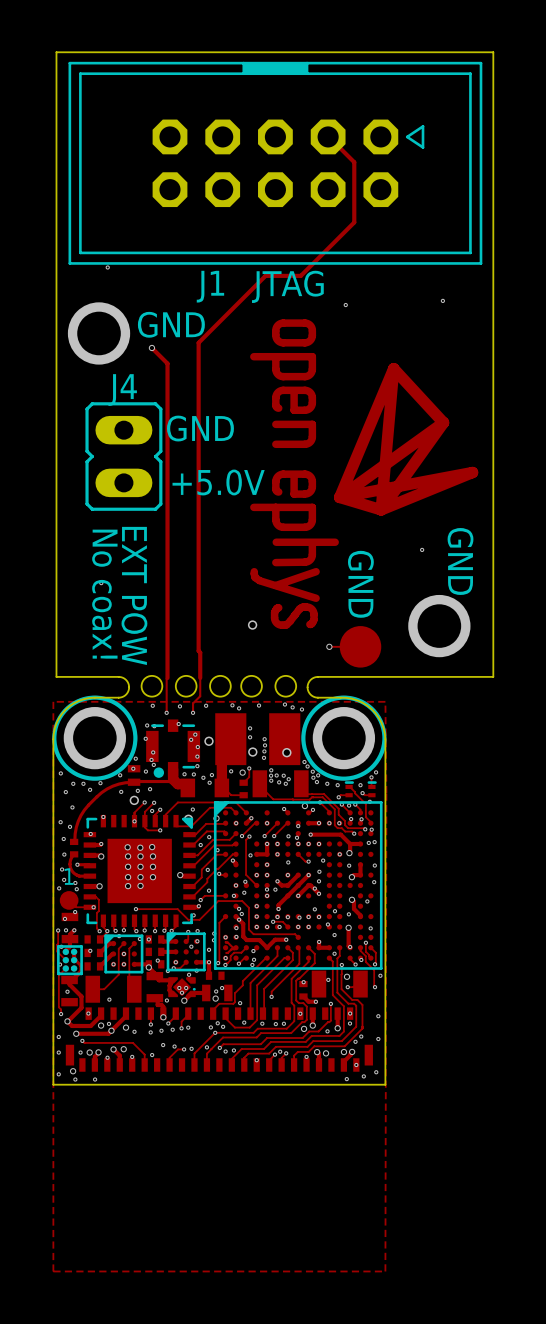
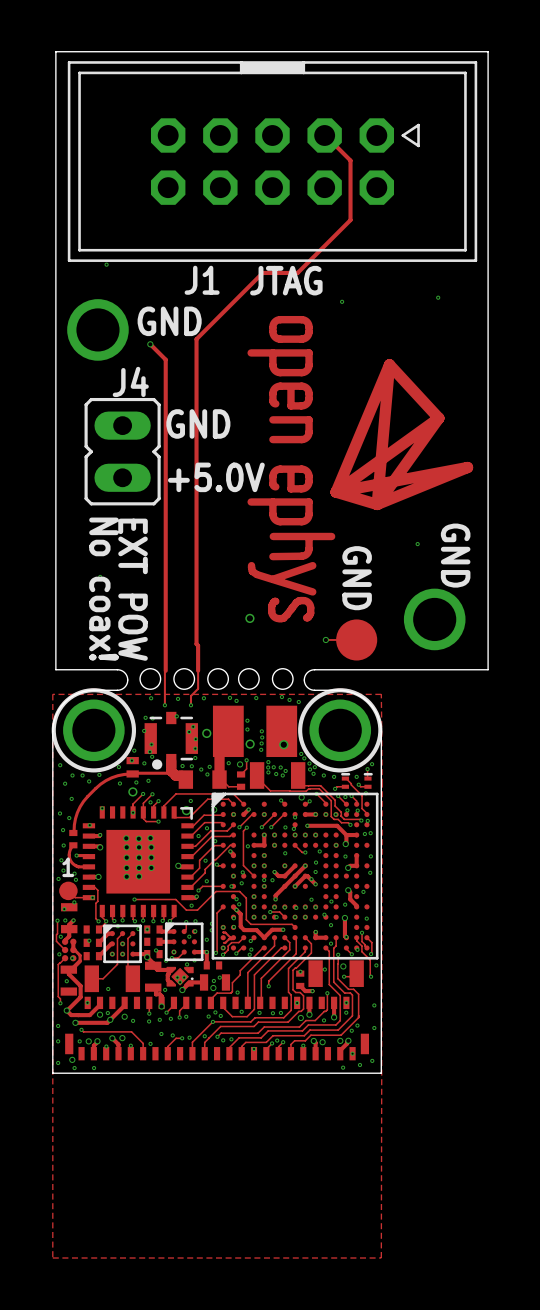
part footprint: [83, 814, 196, 927] -> [82, 806, 194, 918]
part footprint: [57, 945, 83, 976] -> [61, 938, 77, 962]

